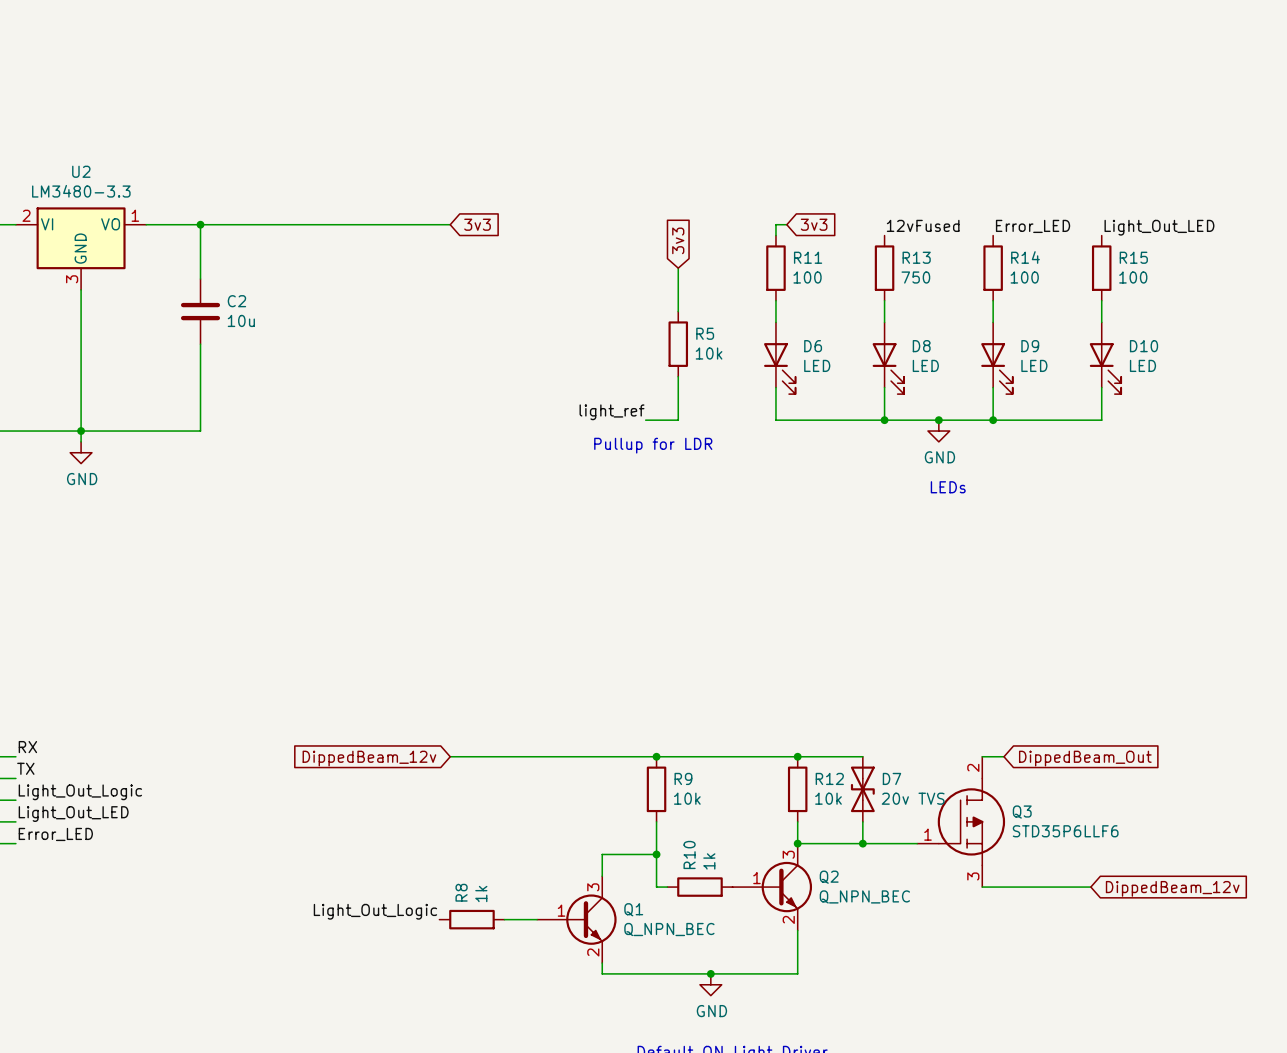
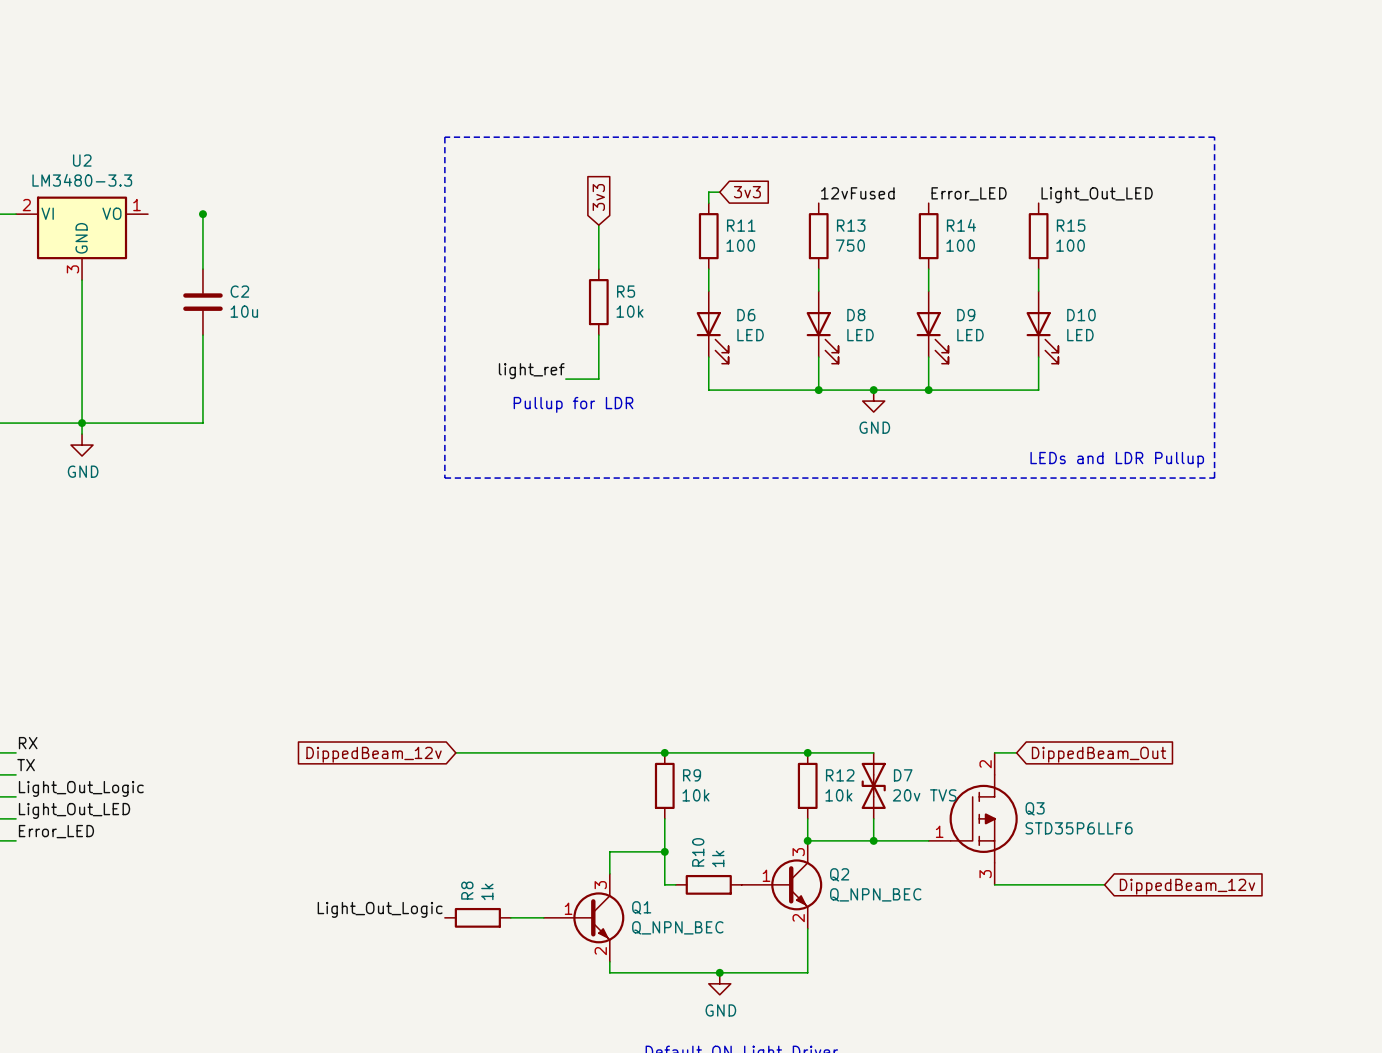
line: none -> (444, 137) (444, 478) (1214, 478) (1214, 137) (444, 137)
global label: none -> 3v3 (747, 192)
global label: none -> 3v3 (598, 197)
wire: (146, 224) (450, 224) -> none
global label: 3v3 (477, 224) -> none
wire: (786, 224) (775, 224) (775, 235) -> (719, 192) (708, 192) (708, 203)
global label: 3v3 (814, 224) -> none
label position: 12vFused (923, 225) -> 12vFused (857, 193)
label position: Error_LED (1033, 226) -> Error_LED (969, 193)
label position: Light_Out_LED (1159, 227) -> Light_Out_LED (1097, 195)
global label: 3v3 (678, 240) -> none
wire: (678, 268) (678, 311) -> (598, 225) (598, 269)
R11 position: (775, 268) -> (708, 236)
R13 position: (884, 268) -> (818, 236)
R14 position: (993, 268) -> (928, 236)
R15 position: (1101, 268) -> (1038, 236)
wire: (775, 300) (775, 322) -> (708, 269) (708, 291)
wire: (884, 300) (884, 322) -> (818, 269) (818, 291)
wire: (993, 300) (993, 322) -> (928, 269) (928, 291)
wire: (1101, 300) (1101, 322) -> (1038, 269) (1038, 291)
R5 position: (678, 344) -> (598, 302)
D6 position: (779, 358) -> (712, 327)
D8 position: (888, 358) -> (822, 327)
D9 position: (996, 358) -> (932, 327)
D10 position: (1105, 358) -> (1042, 327)
wire: (678, 376) (678, 420) (645, 420) -> (598, 335) (598, 379) (565, 379)
wire: (775, 387) (775, 420) (1101, 420) (1101, 387) -> (708, 357) (708, 390) (1038, 390) (1038, 357)
wire: (884, 387) (884, 420) -> (818, 357) (818, 390)
wire: (993, 387) (993, 420) -> (928, 357) (928, 390)
junction: none -> (818, 390)
junction: none -> (873, 390)
junction: none -> (928, 390)
label position: light_ref (611, 412) -> light_ref (531, 371)
junction: (884, 420) -> none
junction: (938, 420) -> none
junction: (993, 420) -> none
power symbol position: GND (938, 431) -> GND (873, 401)
text position: Pullup for LDR (653, 445) -> Pullup for LDR (573, 404)
text: none -> LEDs and LDR Pullup (1117, 459)
text: LEDs (948, 487) -> none

